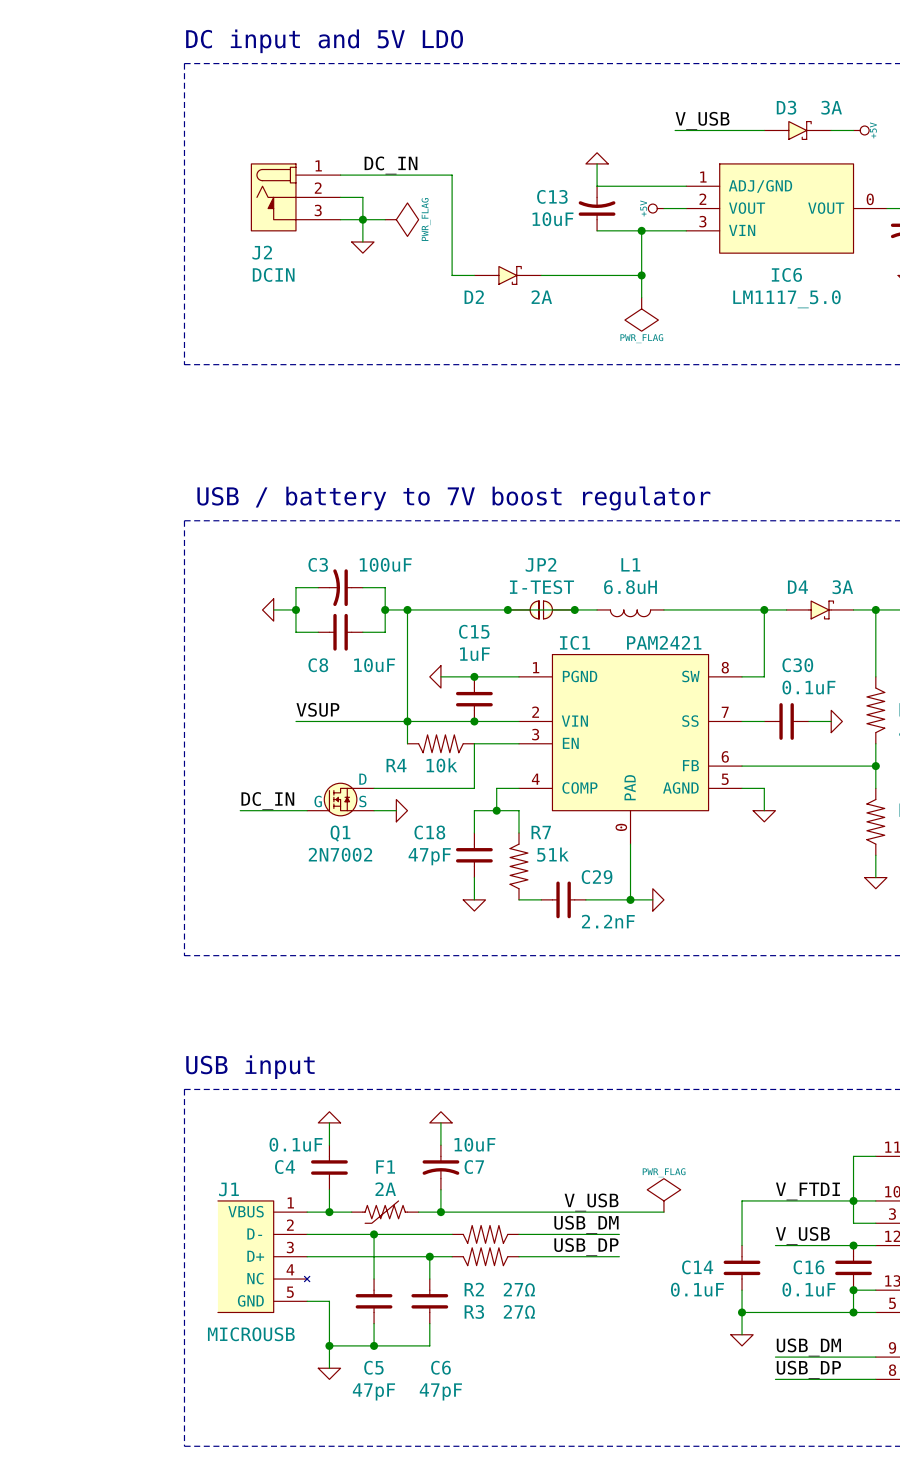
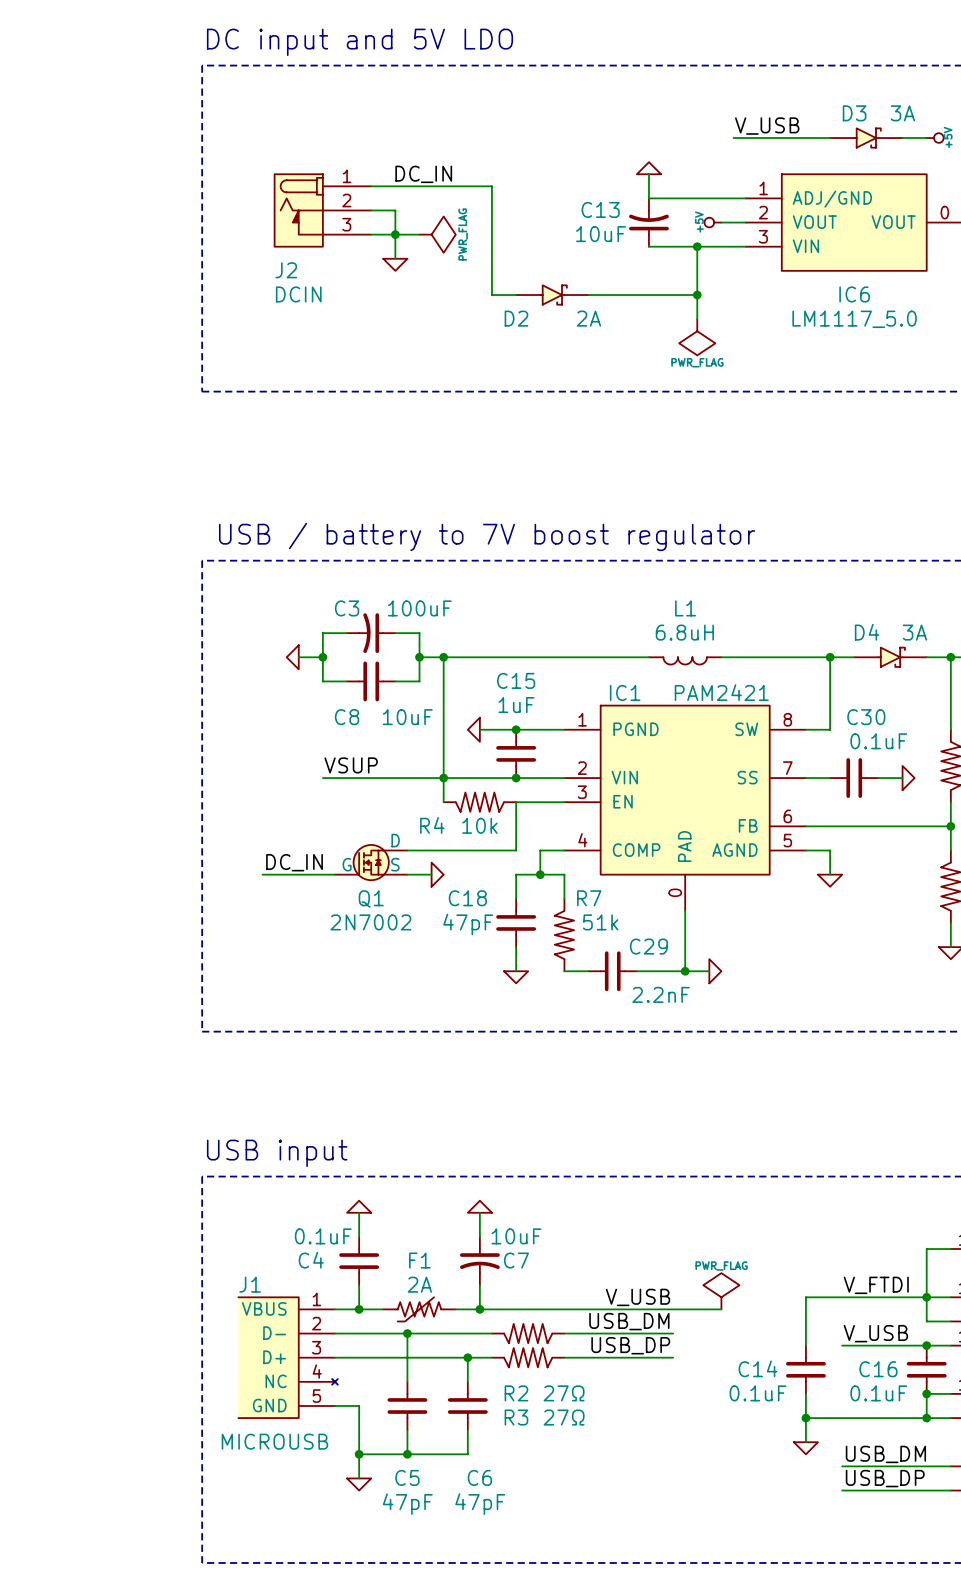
junction: (507, 609) -> none
JP2: I-TEST (541, 609) -> none
junction: (574, 609) -> none

